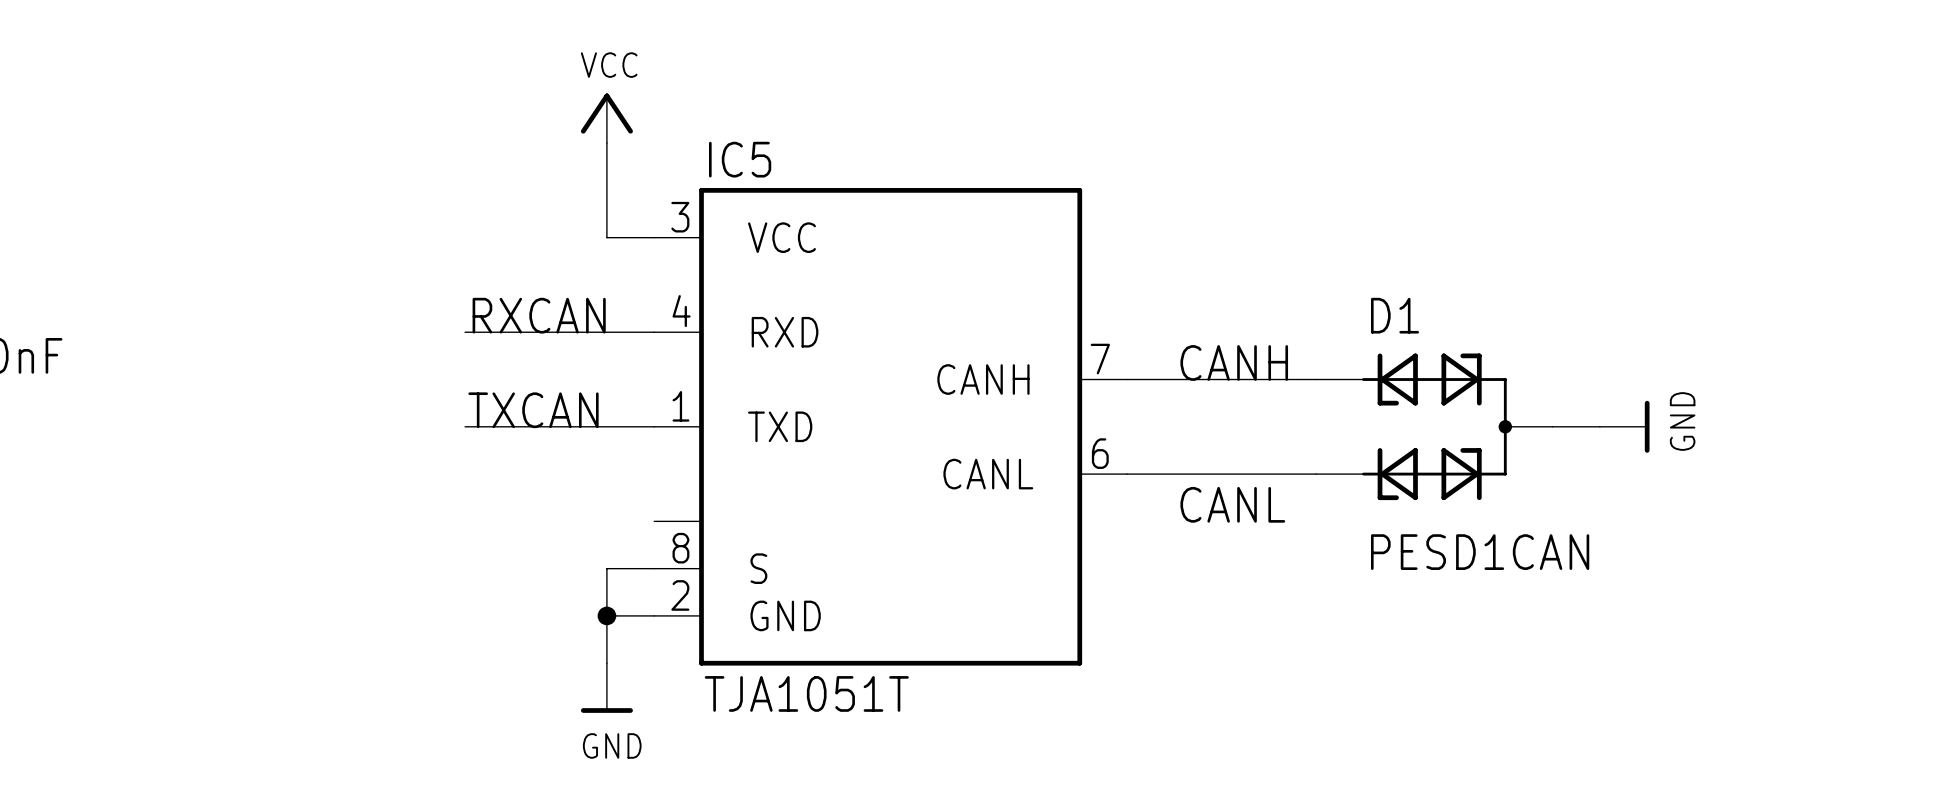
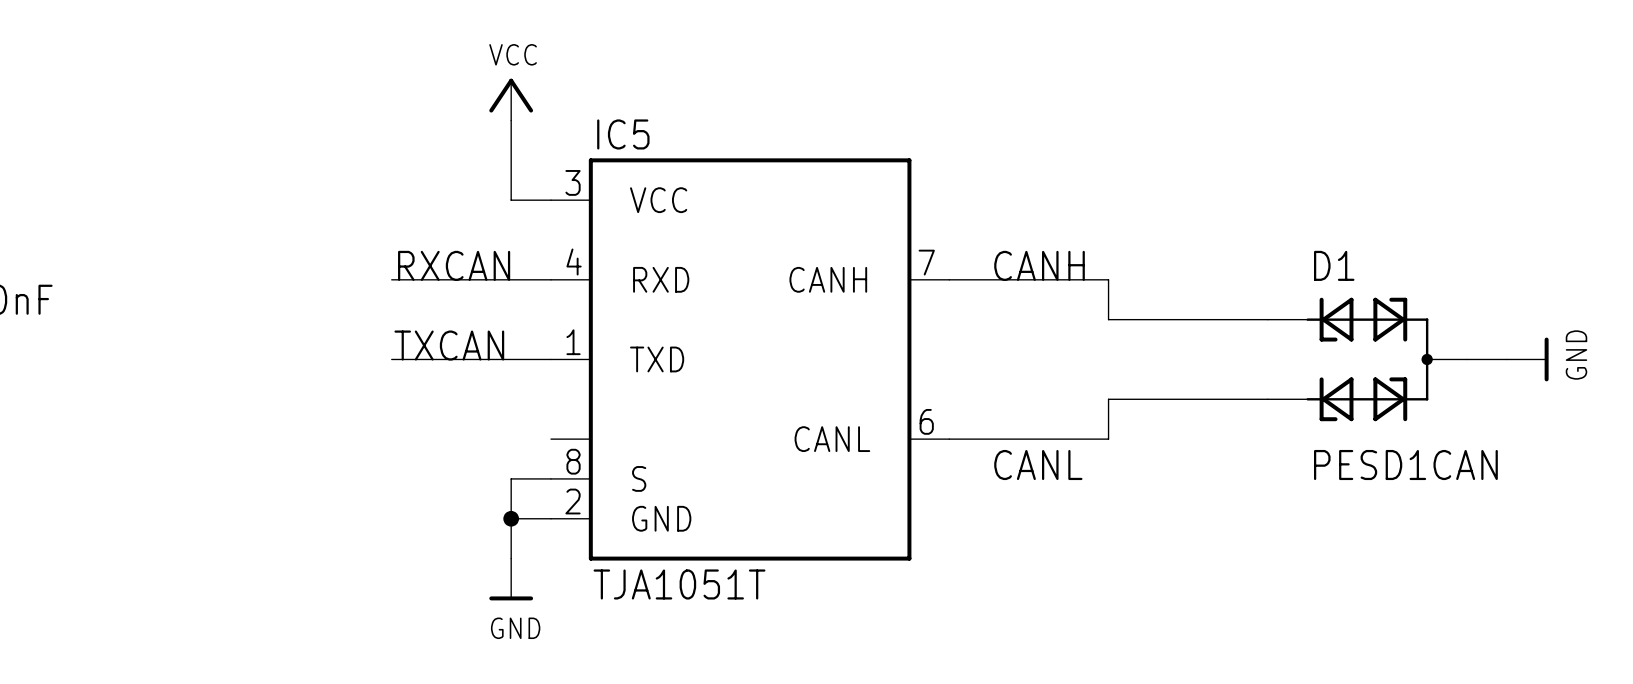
IC5 symbol: [654, 188, 1128, 666] -> [551, 158, 950, 561]
wire: none -> (949, 279) (1108, 279) (1108, 319) (1267, 319)
label position: CANH (1234, 362) -> CANH (1039, 265)
wire: (1127, 379) (1316, 379) -> none
D1 position: (1434, 426) -> (1367, 359)
wire: (1552, 426) (1599, 426) -> (1466, 359) (1506, 359)
power symbol position: GND (1624, 426) -> GND (1527, 359)
wire: (1127, 474) (1316, 474) -> none
wire: none -> (1267, 399) (1108, 399) (1108, 439) (949, 439)
label position: CANL (1232, 504) -> CANL (1038, 465)

